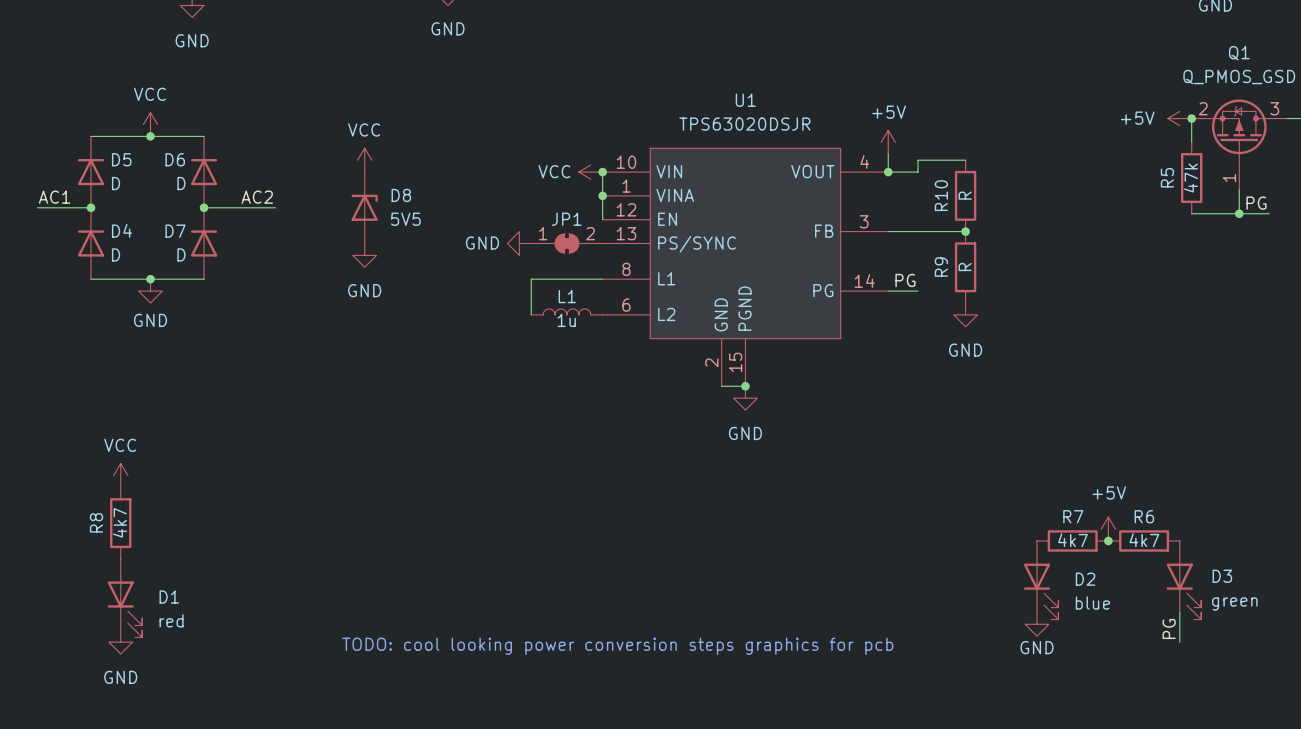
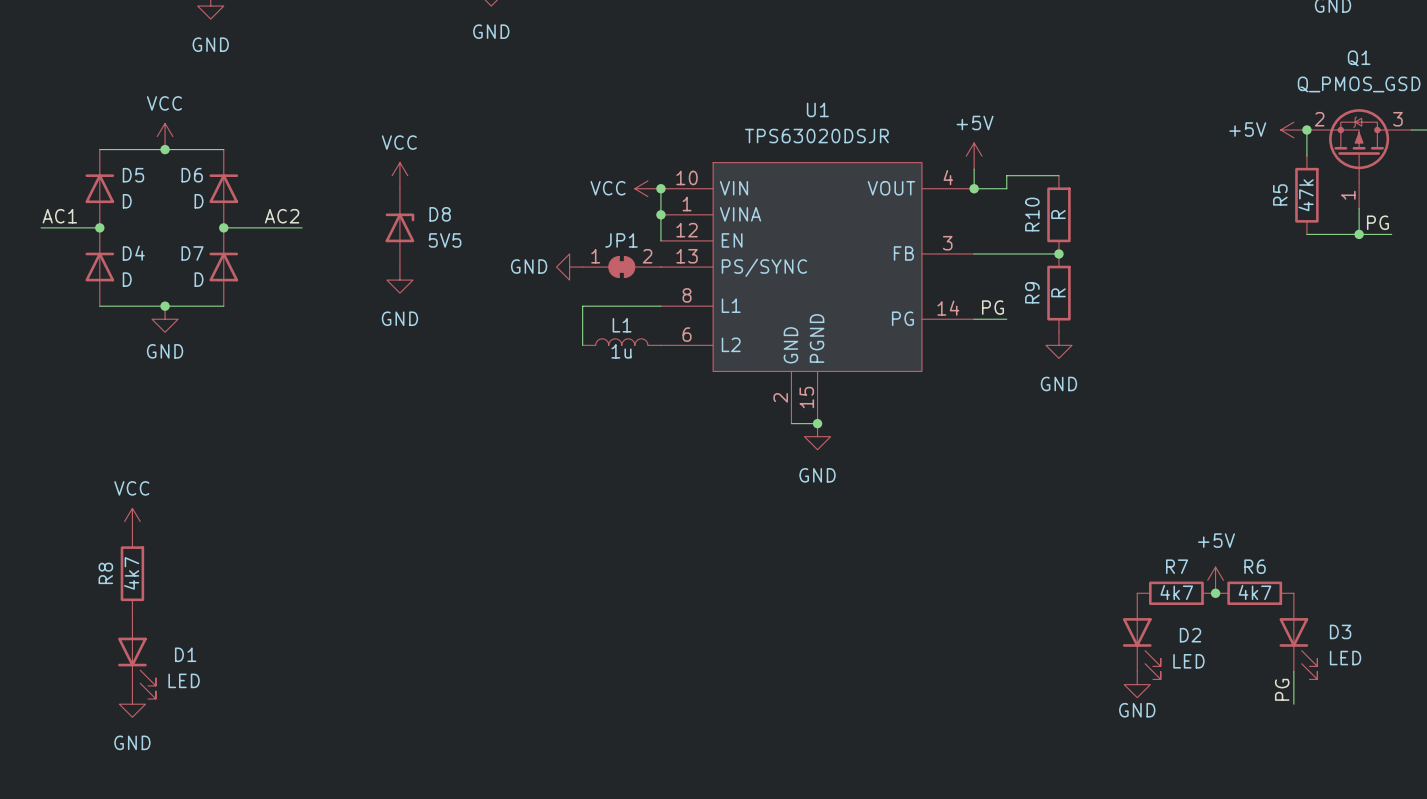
D2 value: blue (1092, 603) -> LED (1188, 661)
D3 value: green (1234, 603) -> LED (1345, 658)
D1 value: red (171, 620) -> LED (184, 680)
text: TODO: cool looking power conversion steps graphics for pcb (617, 646) -> none

